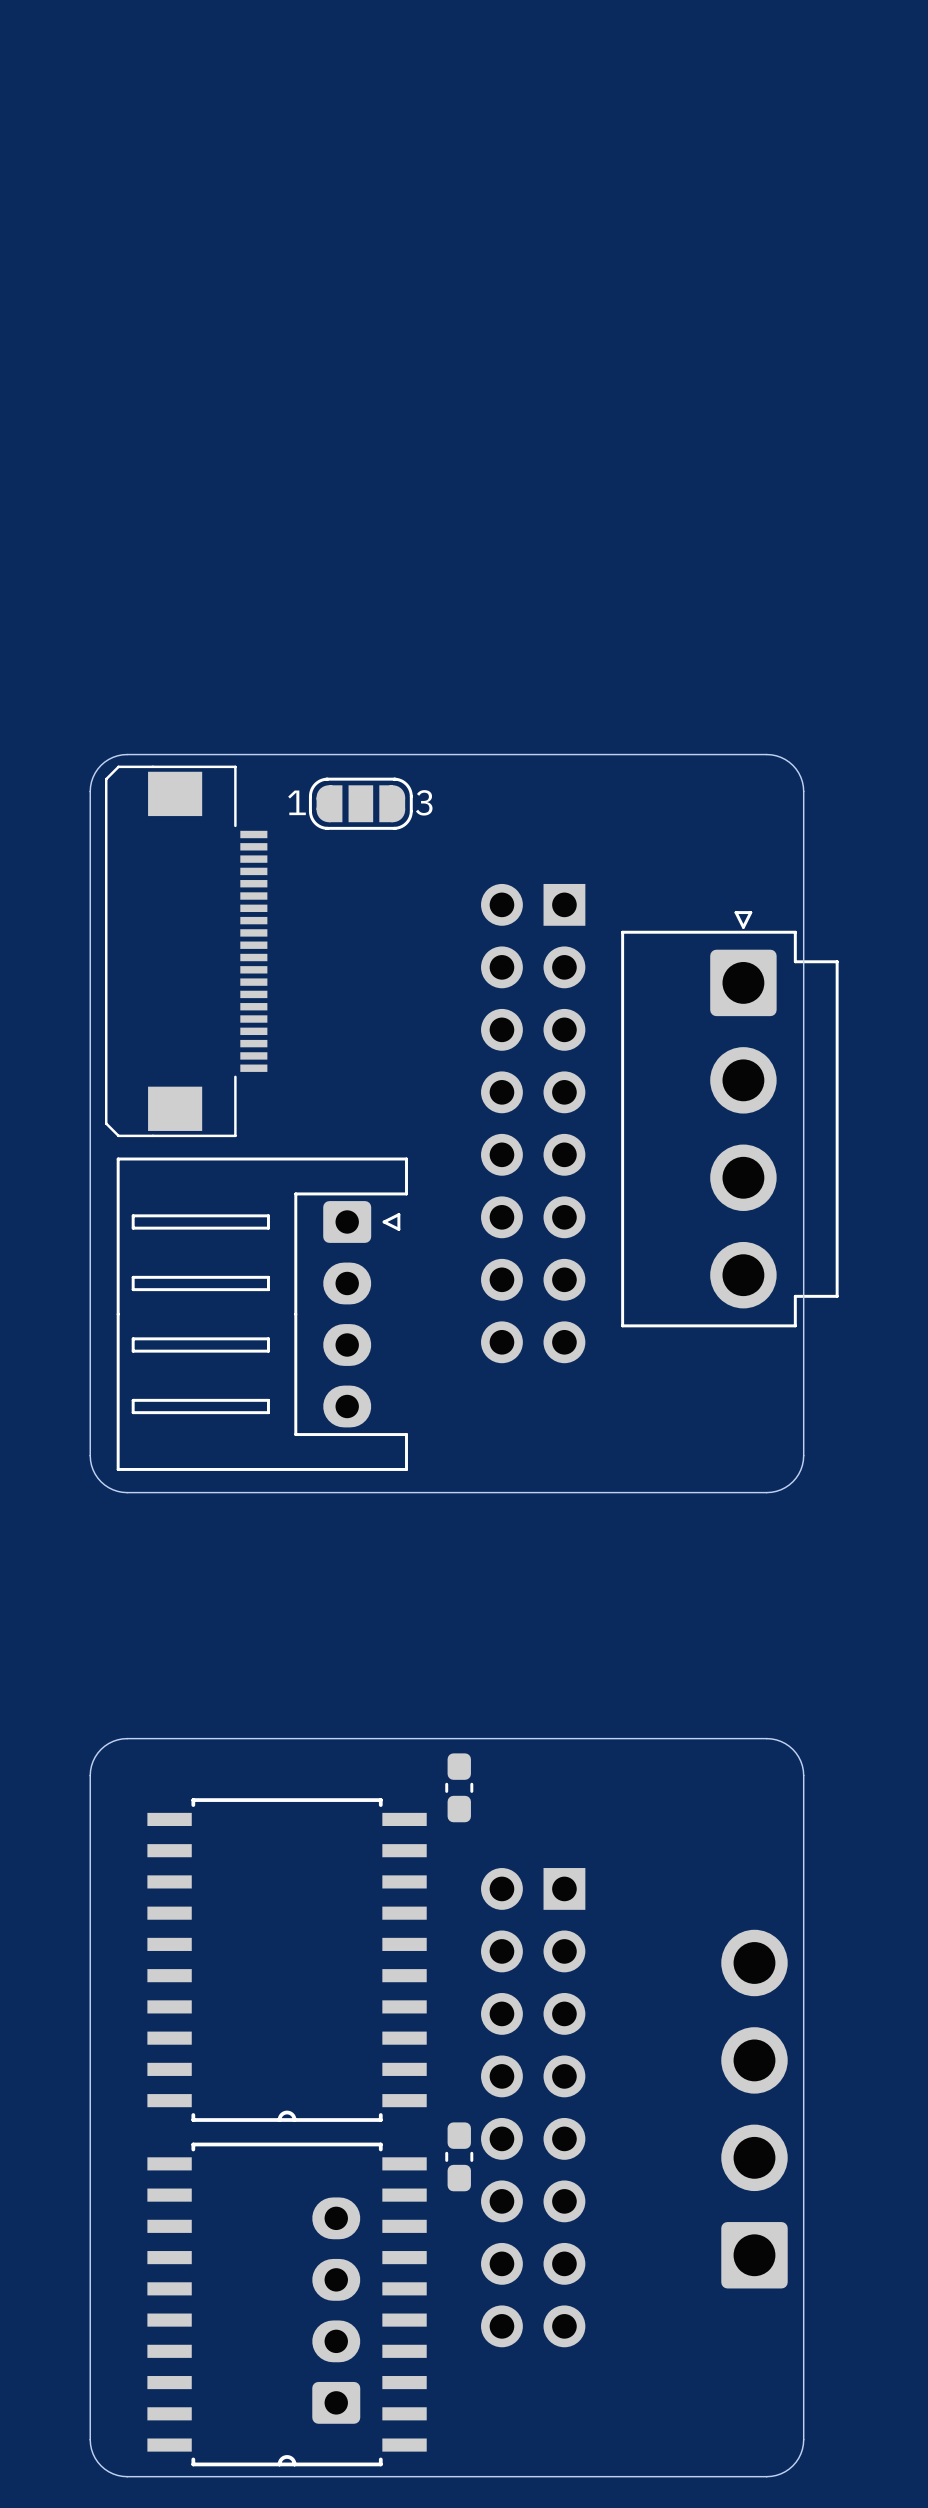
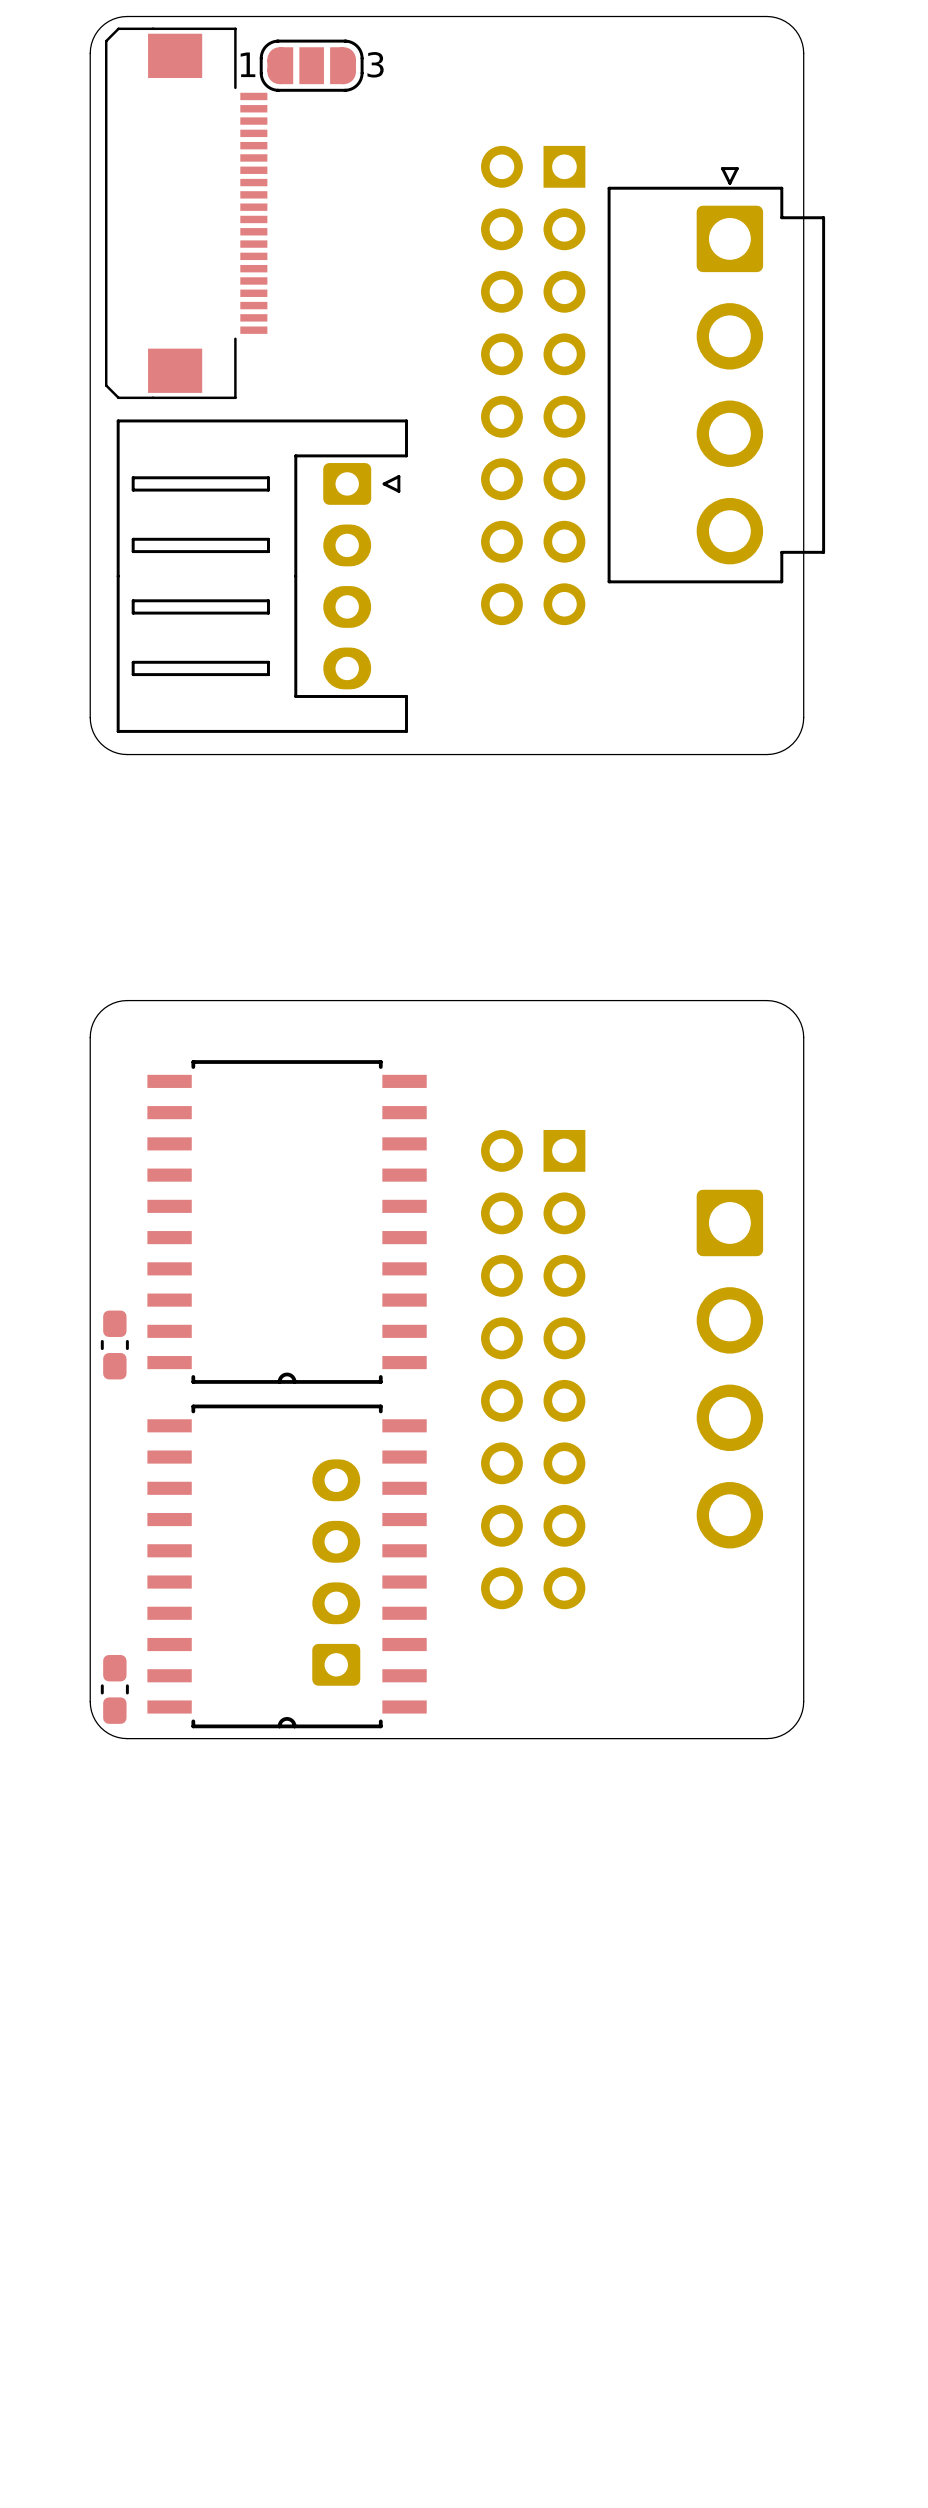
part: none -> (311, 65)
part: none -> (186, 213)
part: none -> (716, 375)
part: none -> (533, 385)
part: none -> (262, 576)
board edge: (127, 754) (113, 757) (101, 765) (93, 777) (90, 786) (90, 1037) -> (127, 754) (113, 751) (101, 743) (93, 731) (90, 717) (90, 53) (93, 39) (101, 27) (113, 19) (127, 16) (766, 16) (780, 19) (796, 30) (800, 39) (803, 53) (803, 717) (800, 731) (792, 743) (780, 751) (766, 754)
board edge: (766, 754) (780, 757) (792, 765) (800, 777) (803, 786) (803, 1037) -> (90, 1037) (93, 1023) (101, 1011) (113, 1003) (127, 1000) (766, 1000) (780, 1003) (792, 1011) (800, 1023) (803, 1037)
part: (360, 803) -> none
part: (186, 951) -> none
part: (729, 1119) -> none
part position: (533, 1123) -> (533, 1369)
part: none -> (287, 1221)
part: (262, 1314) -> none
part: none -> (114, 1344)
part: none -> (729, 1369)
board edge: (90, 1455) (93, 1469) (101, 1481) (113, 1489) (127, 1492) (766, 1492) (780, 1489) (792, 1481) (800, 1469) (803, 1455) -> (90, 1455) (90, 1706) (93, 1715) (101, 1727) (113, 1735) (127, 1738)
part: none -> (287, 1566)
part: none -> (336, 1572)
part: none -> (114, 1689)
board edge: (127, 1738) (113, 1741) (101, 1749) (93, 1761) (90, 1775) (90, 2439) (93, 2453) (101, 2465) (113, 2473) (127, 2476) (766, 2476) (785, 2471) (796, 2462) (802, 2449) (803, 2439) (803, 1775) (800, 1761) (792, 1749) (780, 1741) (766, 1738) -> (803, 1455) (803, 1706) (798, 1720) (792, 1727) (780, 1735) (766, 1738)
part: (459, 1787) -> none
part: (287, 1960) -> none
part: (533, 2107) -> none
part: (754, 2109) -> none
part: (459, 2156) -> none
part: (287, 2304) -> none
part: (336, 2310) -> none

